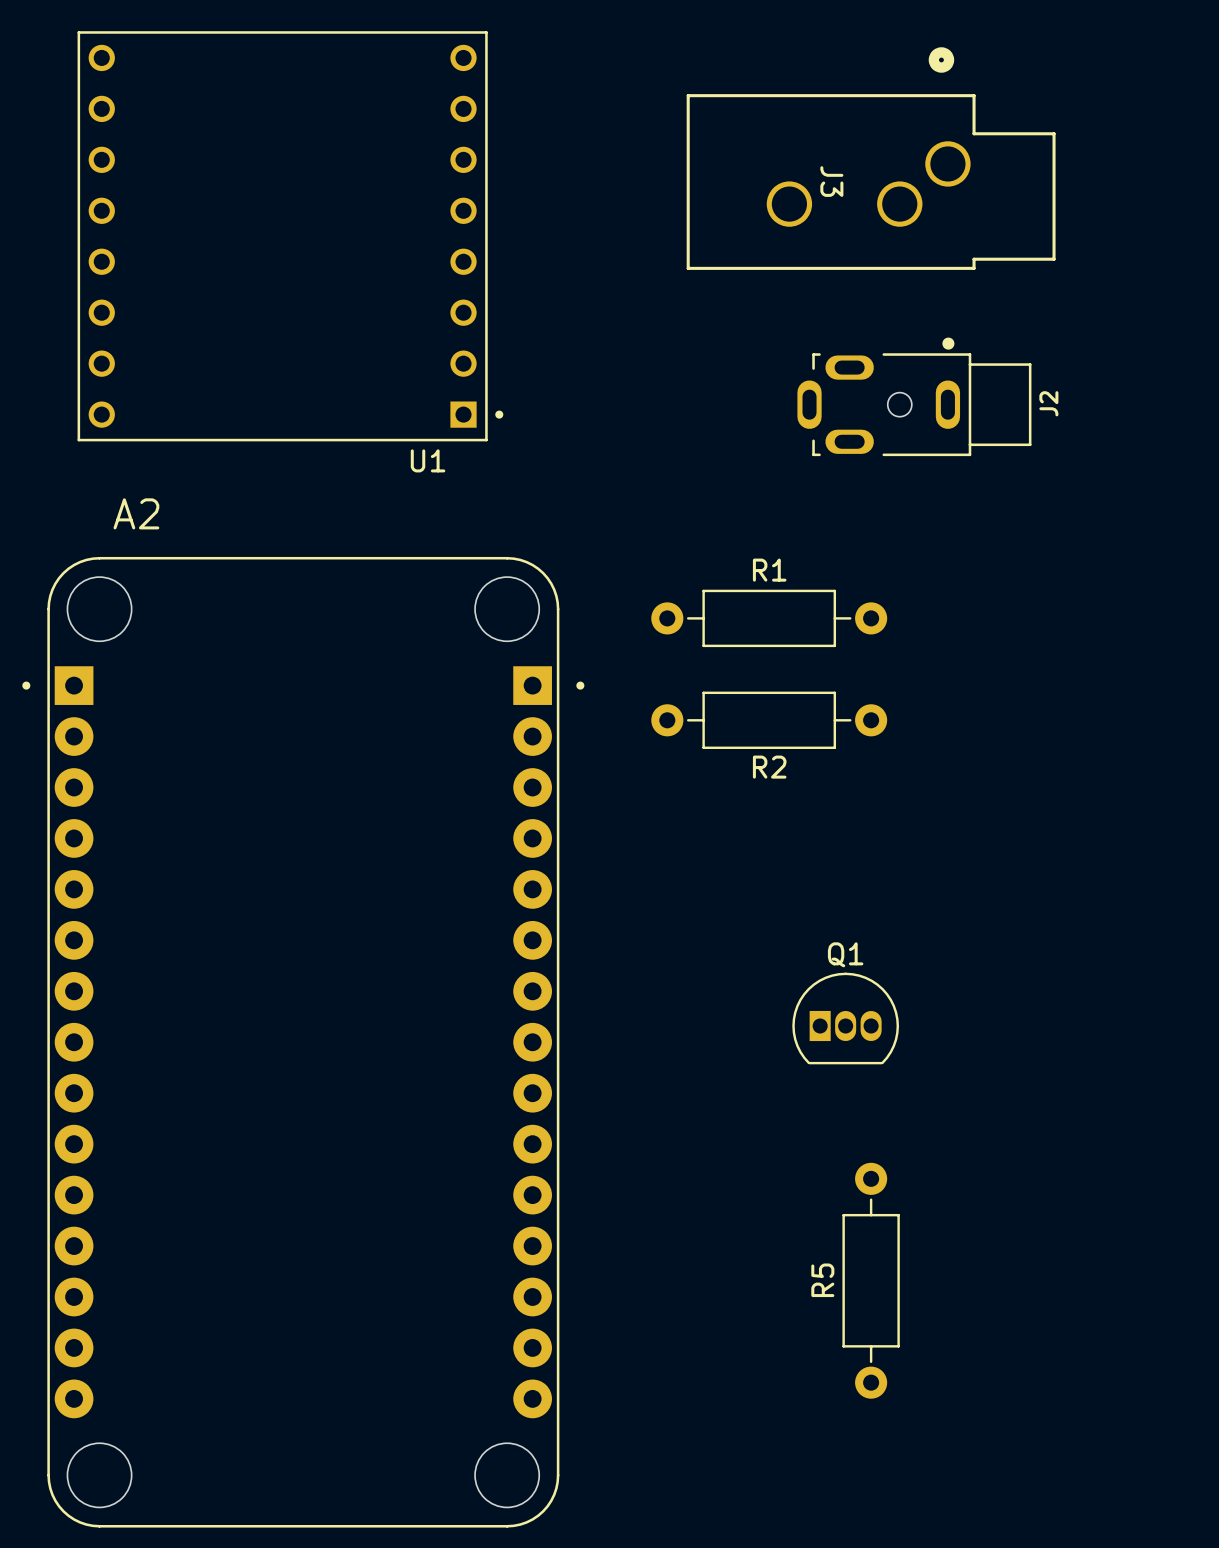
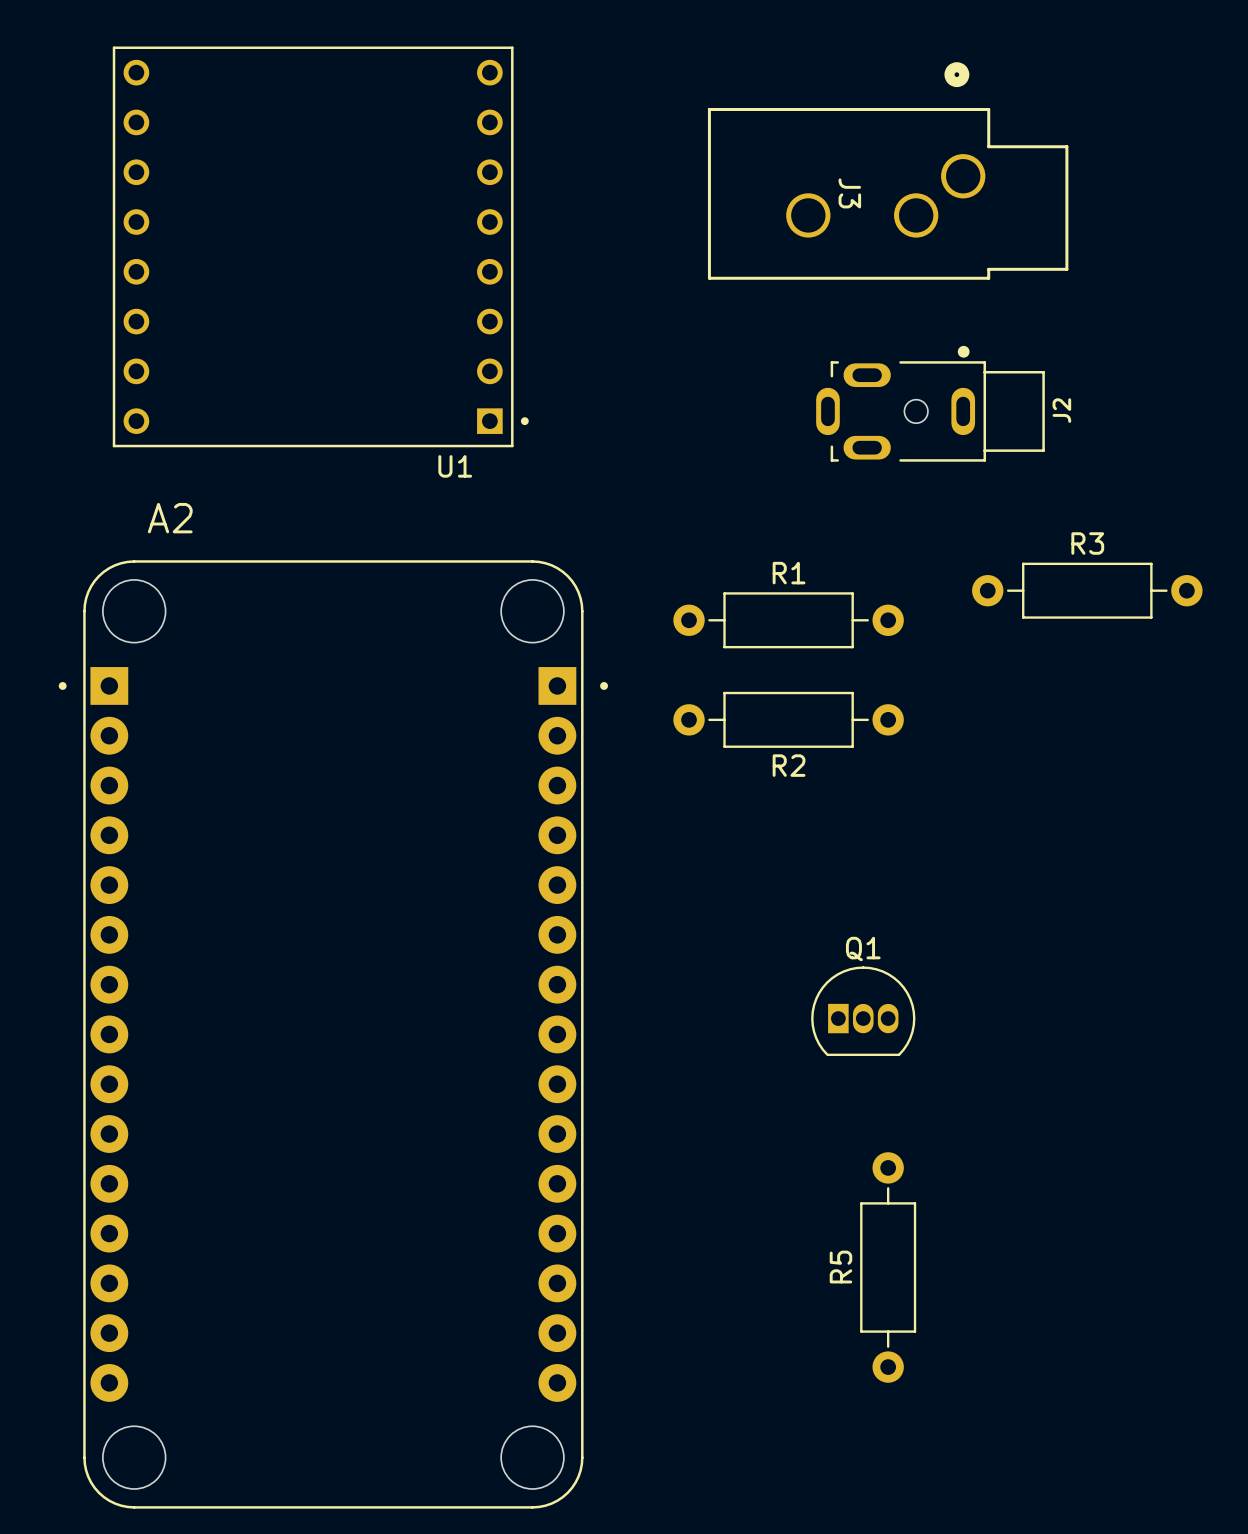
R3: none -> (1087, 590)

